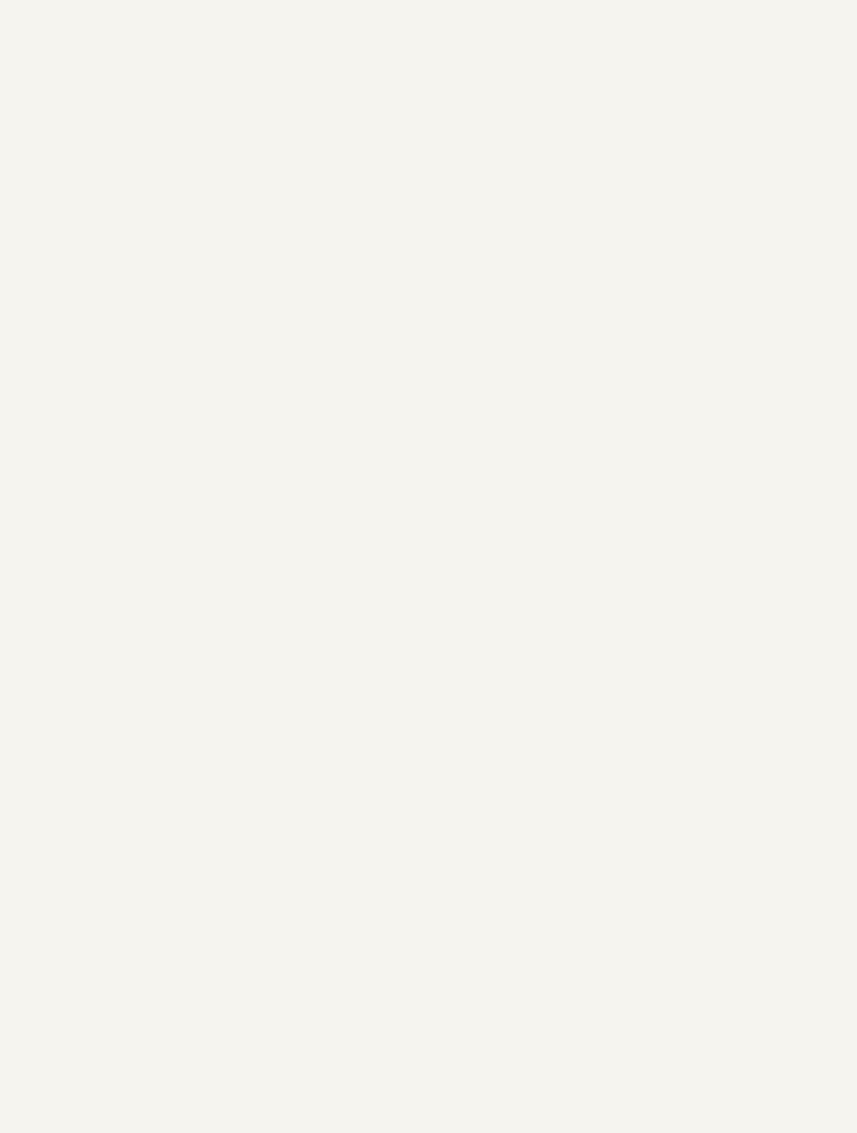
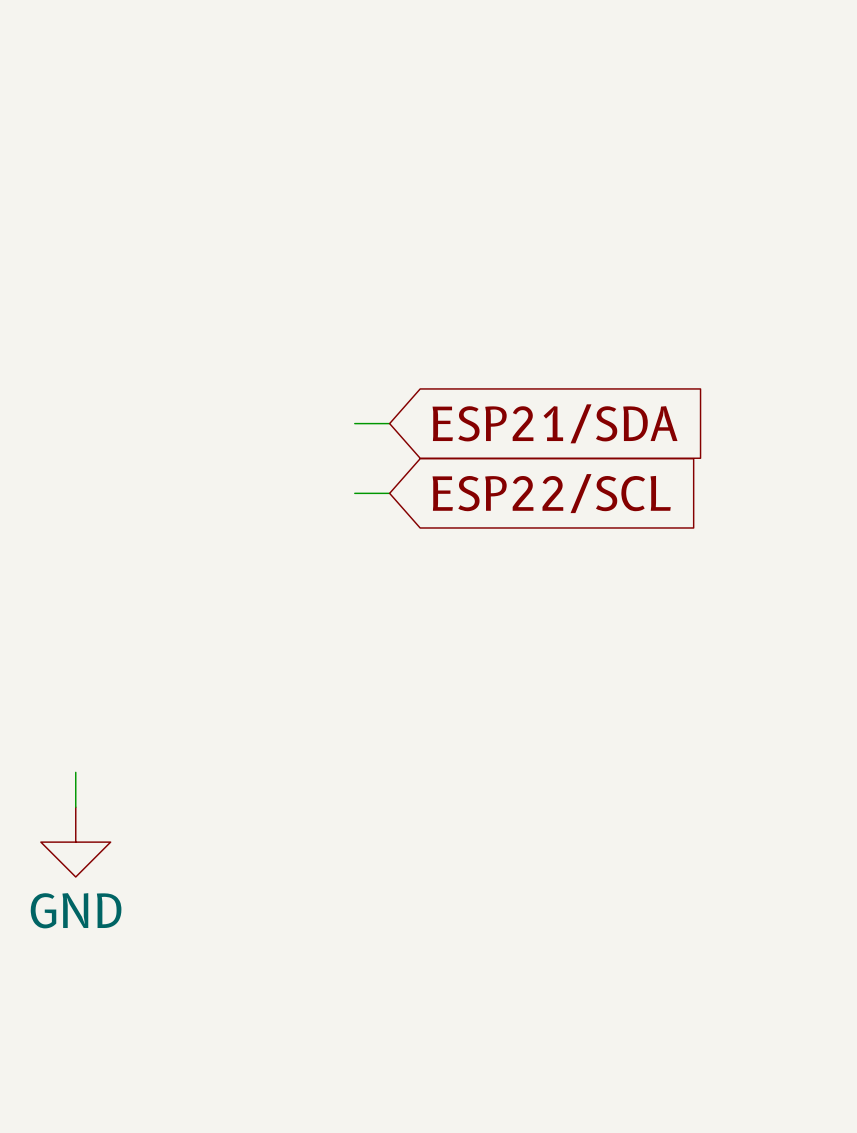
wire: none -> (354, 423) (389, 423)
global label: none -> ESP21/SDA (555, 423)
wire: none -> (354, 493) (389, 493)
global label: none -> ESP22/SCL (551, 493)
wire: none -> (75, 772) (75, 807)
power symbol: none -> GND (75, 842)

